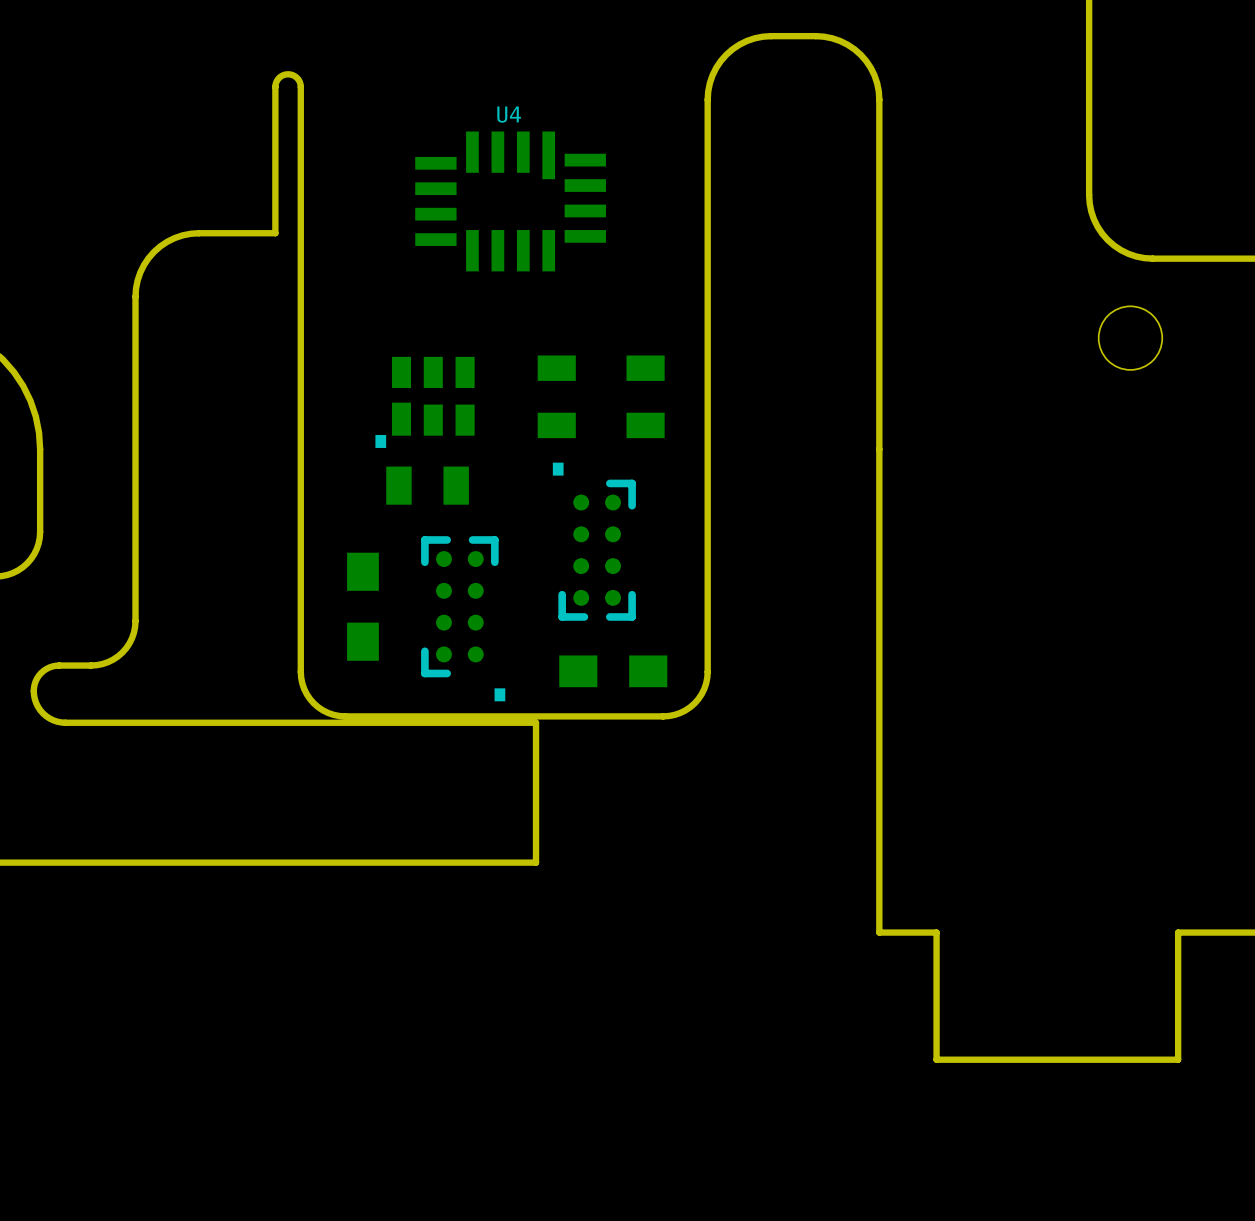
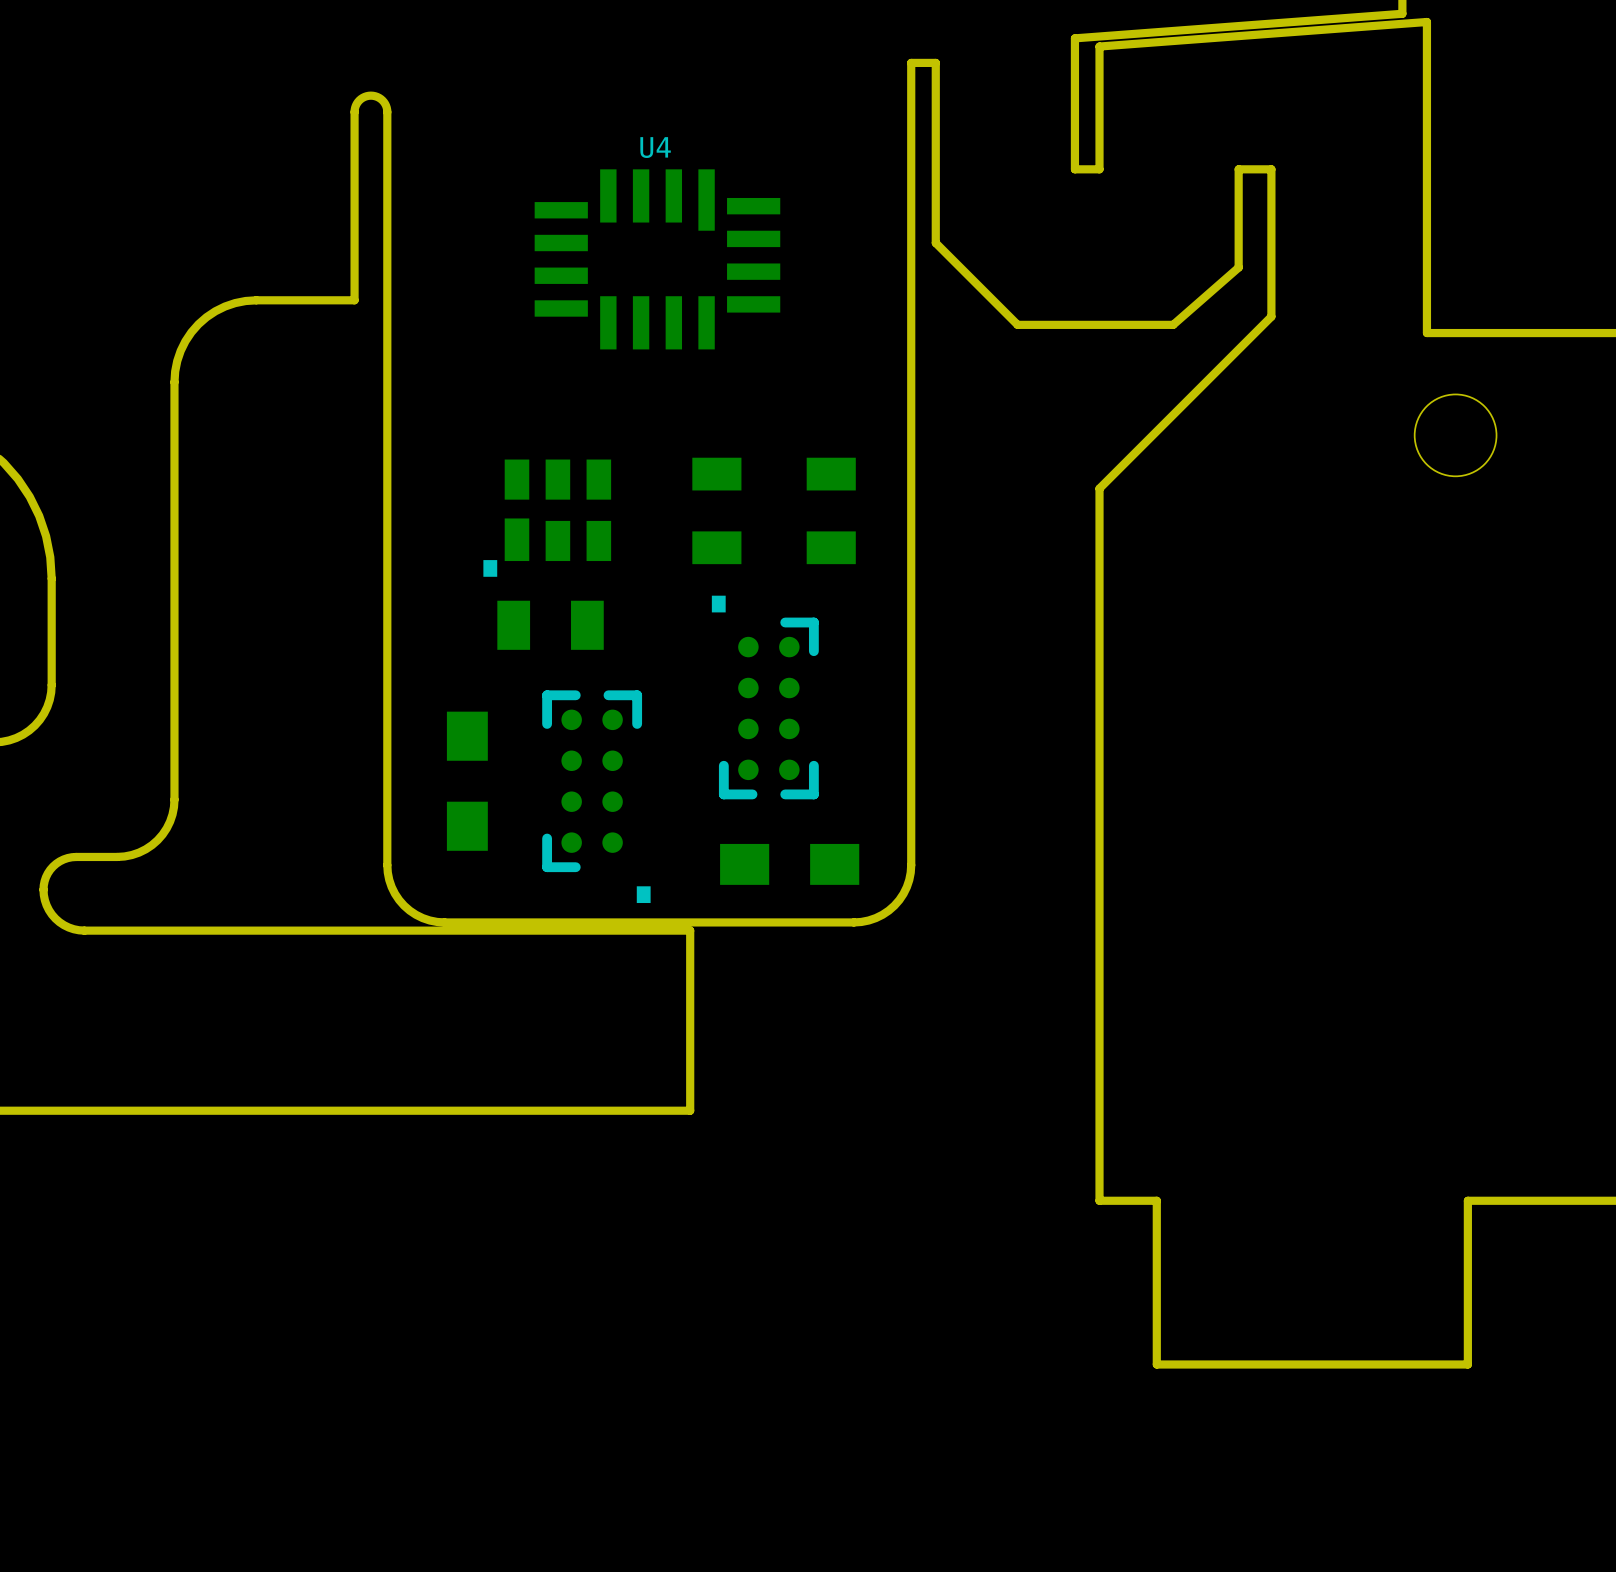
board edge: (1089, 10) (1089, 195) (1091, 211) (1102, 233) (1114, 245) (1128, 253) (1152, 258) -> (1402, 13) (1074, 38) (1074, 169) (1099, 169) (1099, 46) (1426, 21) (1426, 333) (1484, 333)
board edge: (707, 99) (709, 83) (720, 61) (739, 44) (762, 36) (815, 36) (840, 40) (854, 49) (866, 61) (877, 83) (879, 99) (879, 932) -> (911, 128) (911, 62) (935, 62) (935, 243) (1017, 324) (1173, 324) (1238, 267) (1238, 169) (1271, 169) (1271, 316) (1099, 488) (1099, 1200) (1132, 1200)
board edge: (898, 932) (936, 932) (936, 1059) -> (1156, 1200) (1156, 1364) (1205, 1364)
board edge: (1178, 932) (1178, 1059) (1140, 1059) -> (1516, 1200) (1467, 1200) (1467, 1364)

